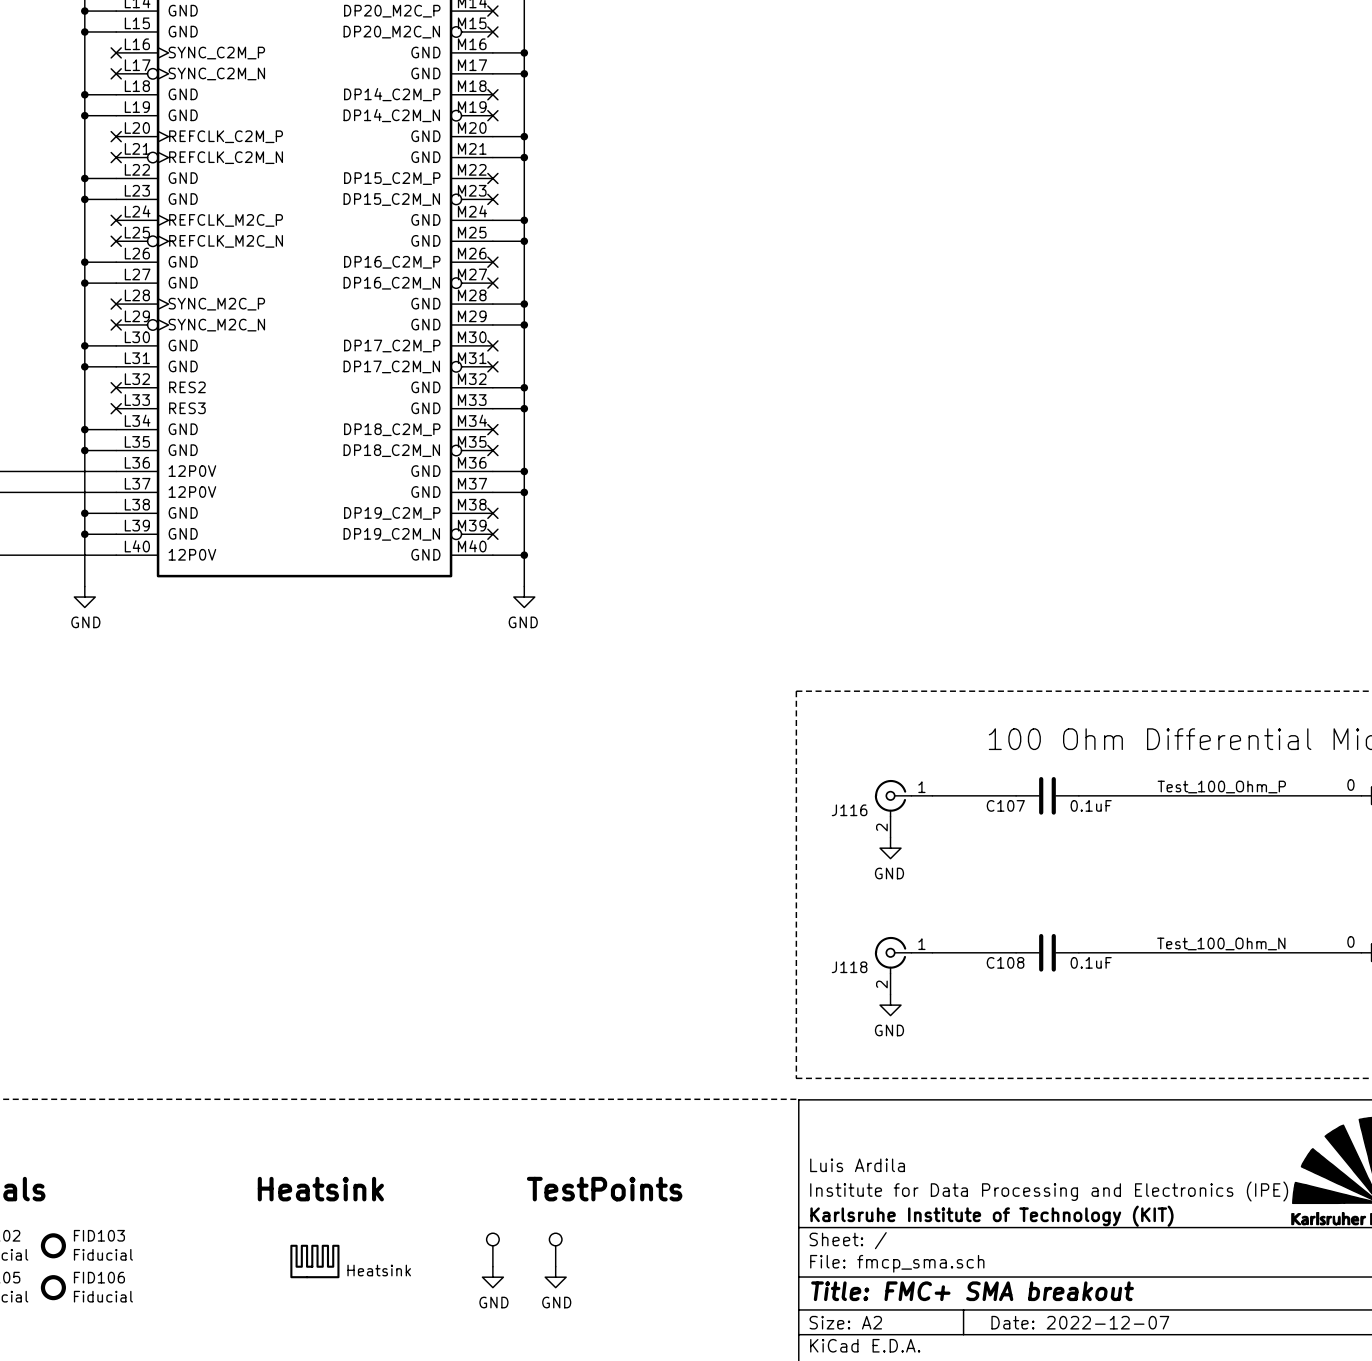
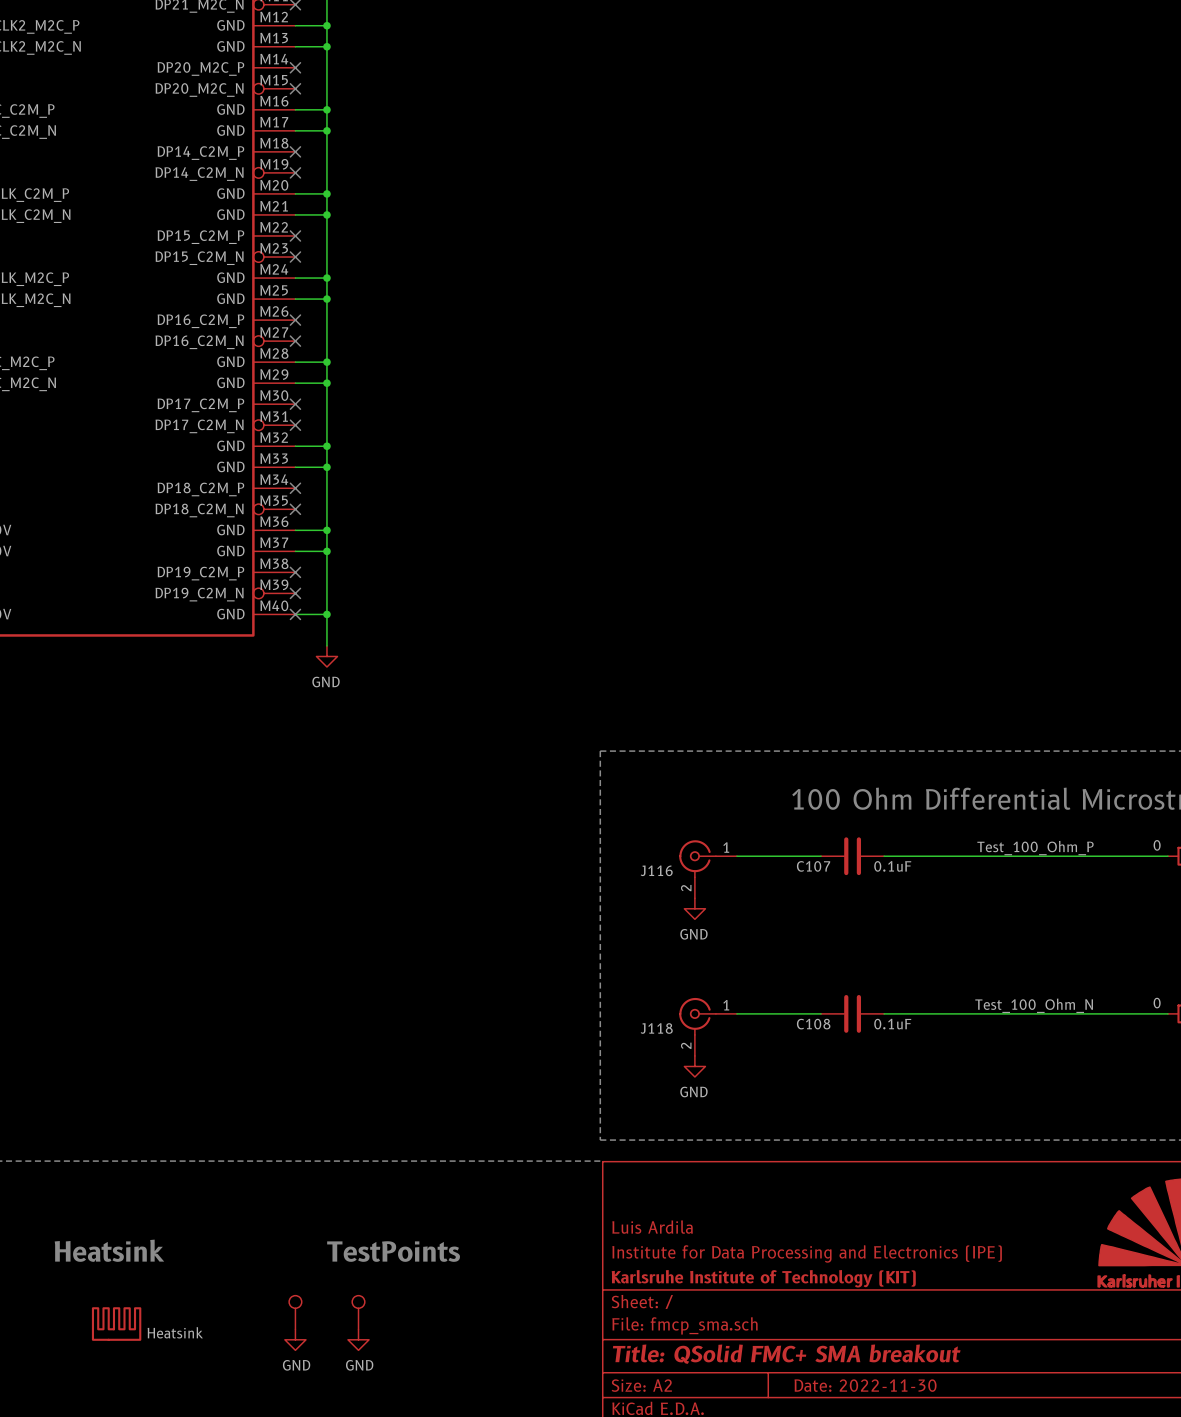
no-connect mark: none -> (295, 614)
title block: Title: FMC+ SMA breakout (972, 1291) -> Title: QSolid FMC+ SMA breakout (786, 1354)
title block: Date: 2022-12-07 (1080, 1322) -> Date: 2022-11-30 (865, 1385)

